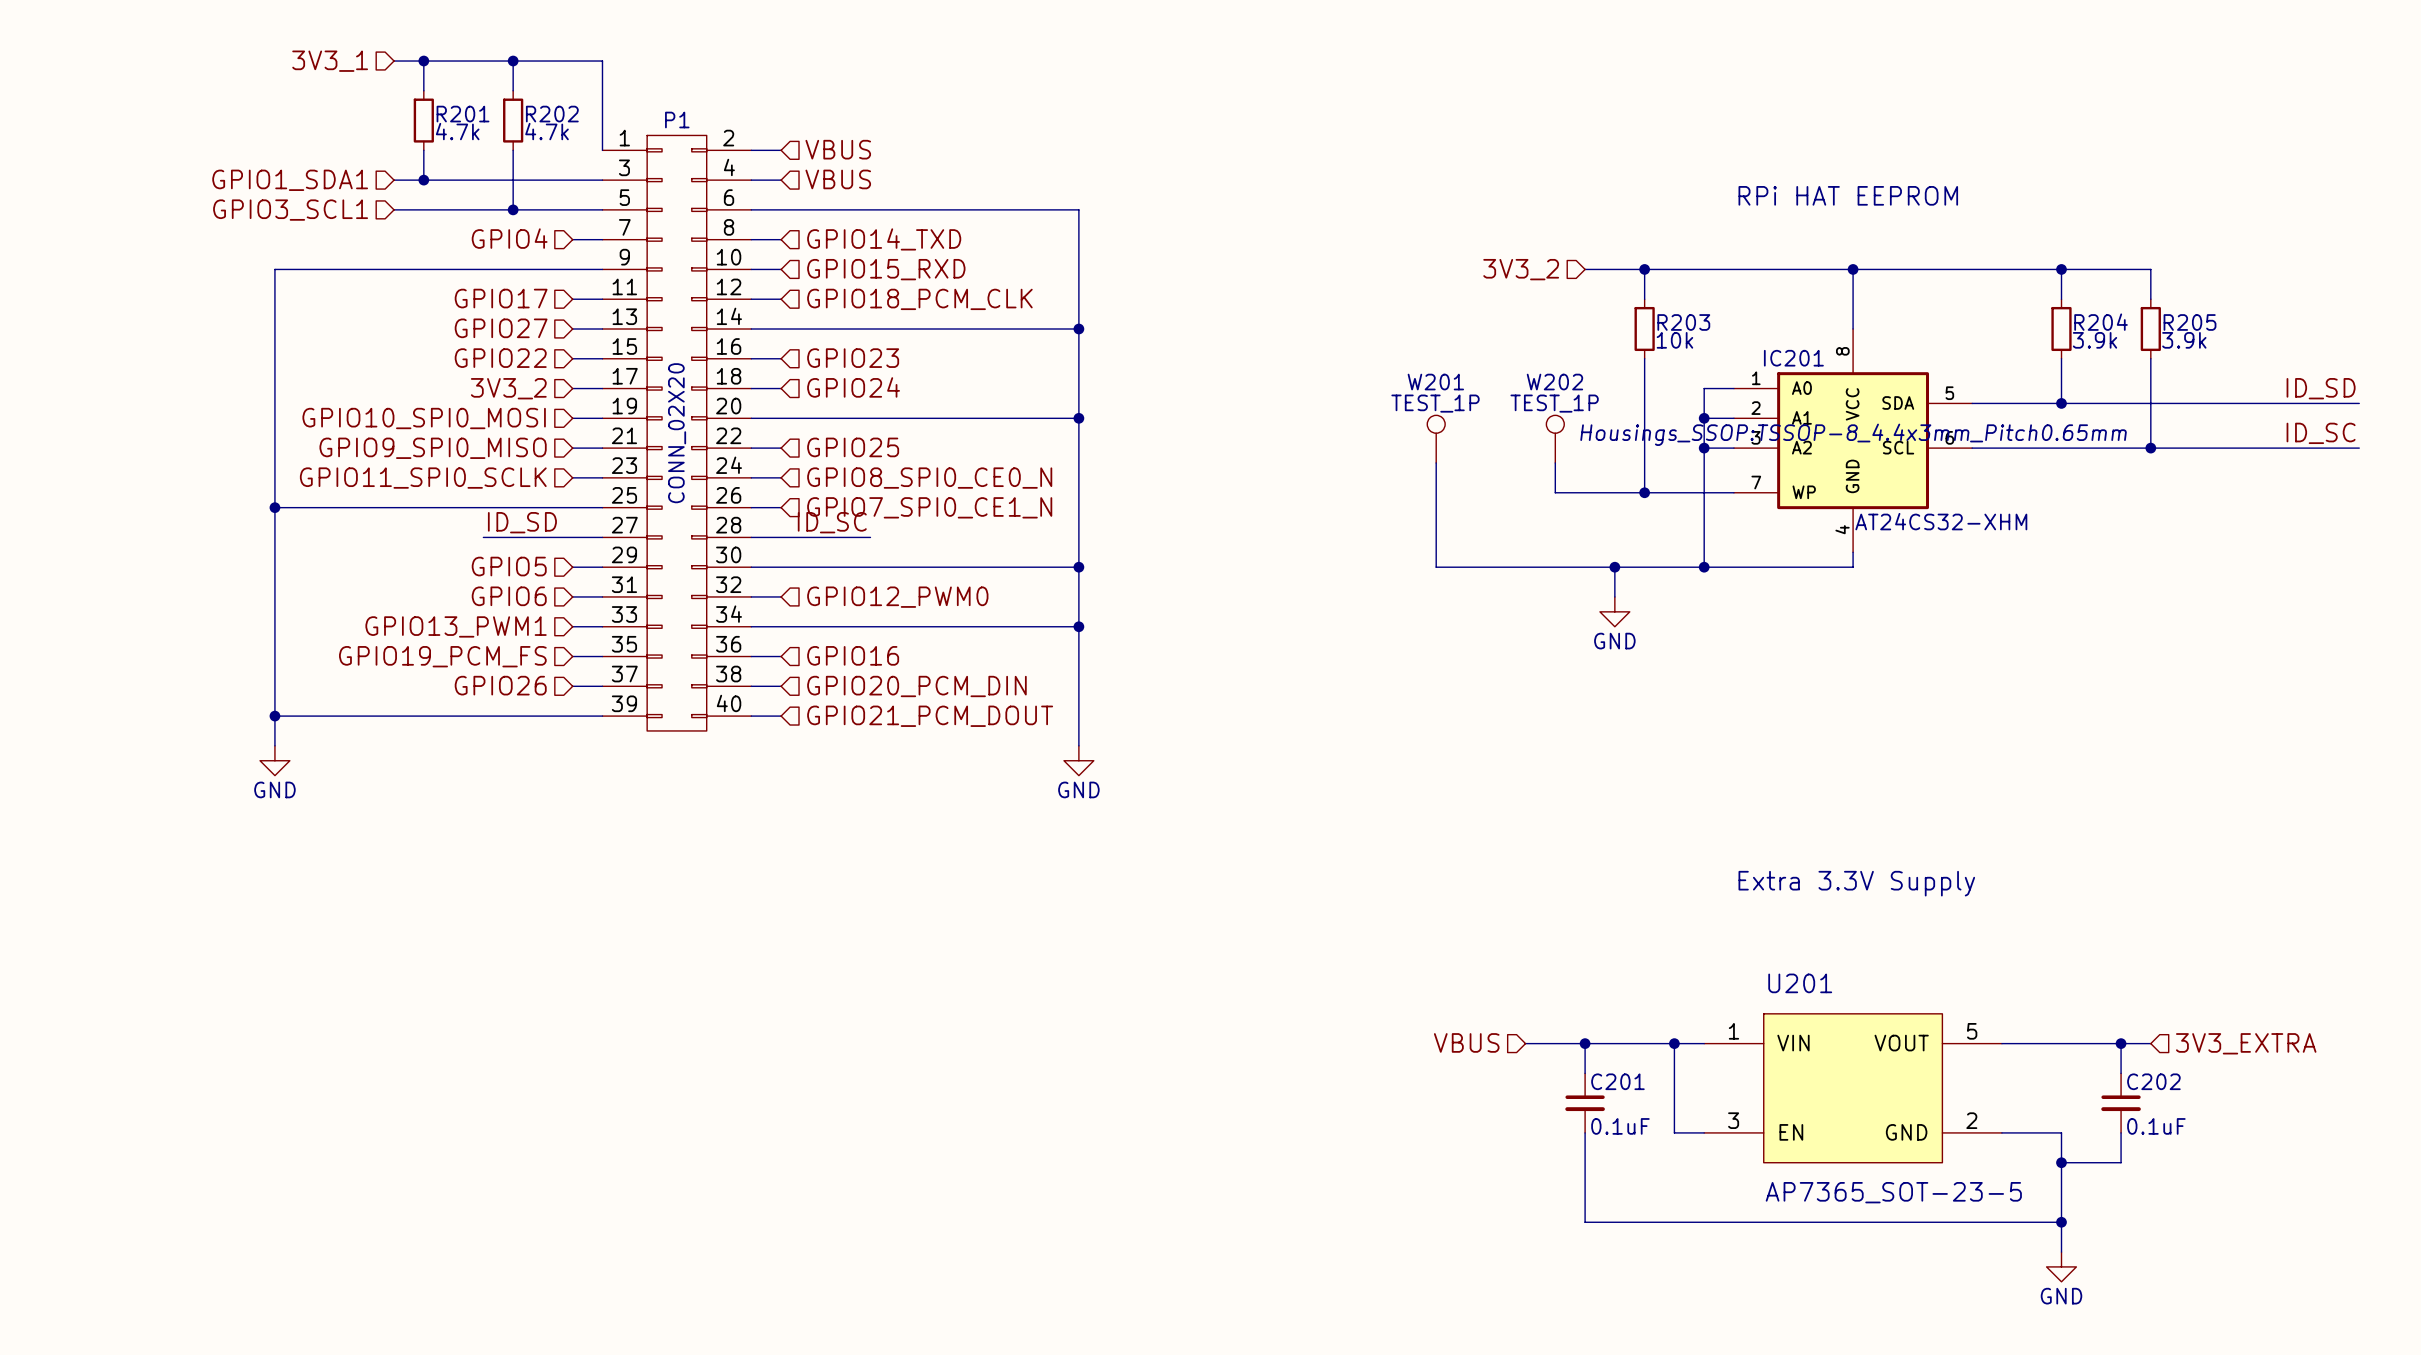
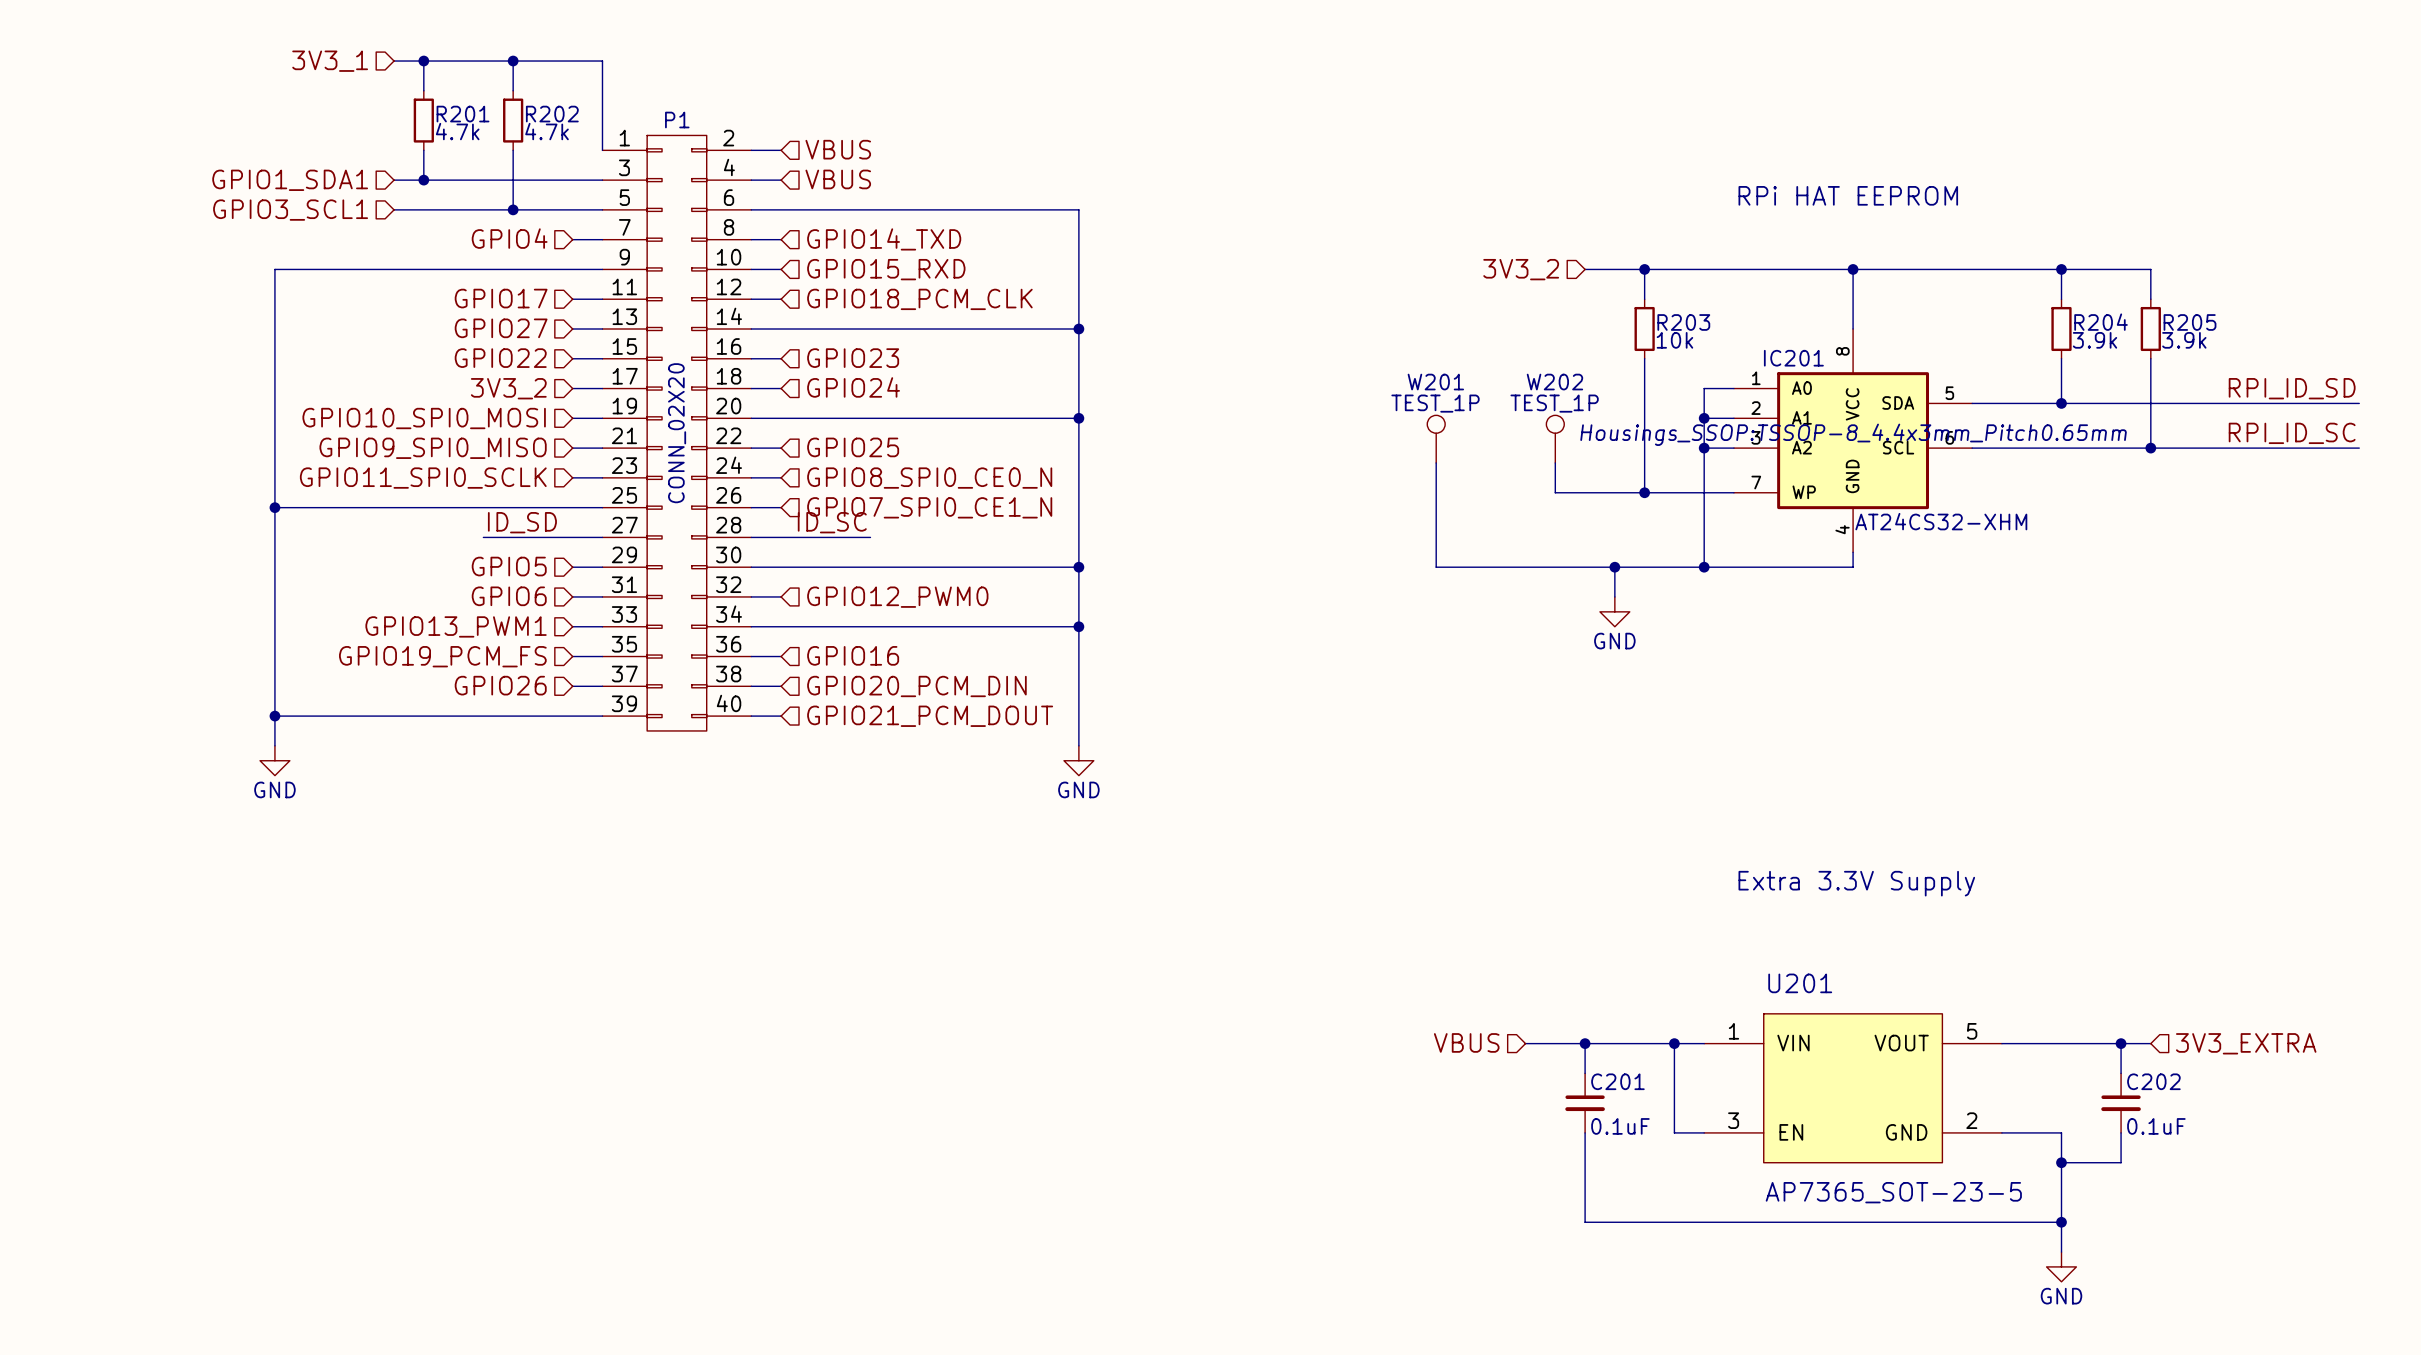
label: ID_SD (2321, 388) -> RPI_ID_SD (2292, 388)
label: ID_SC (2321, 433) -> RPI_ID_SC (2292, 433)

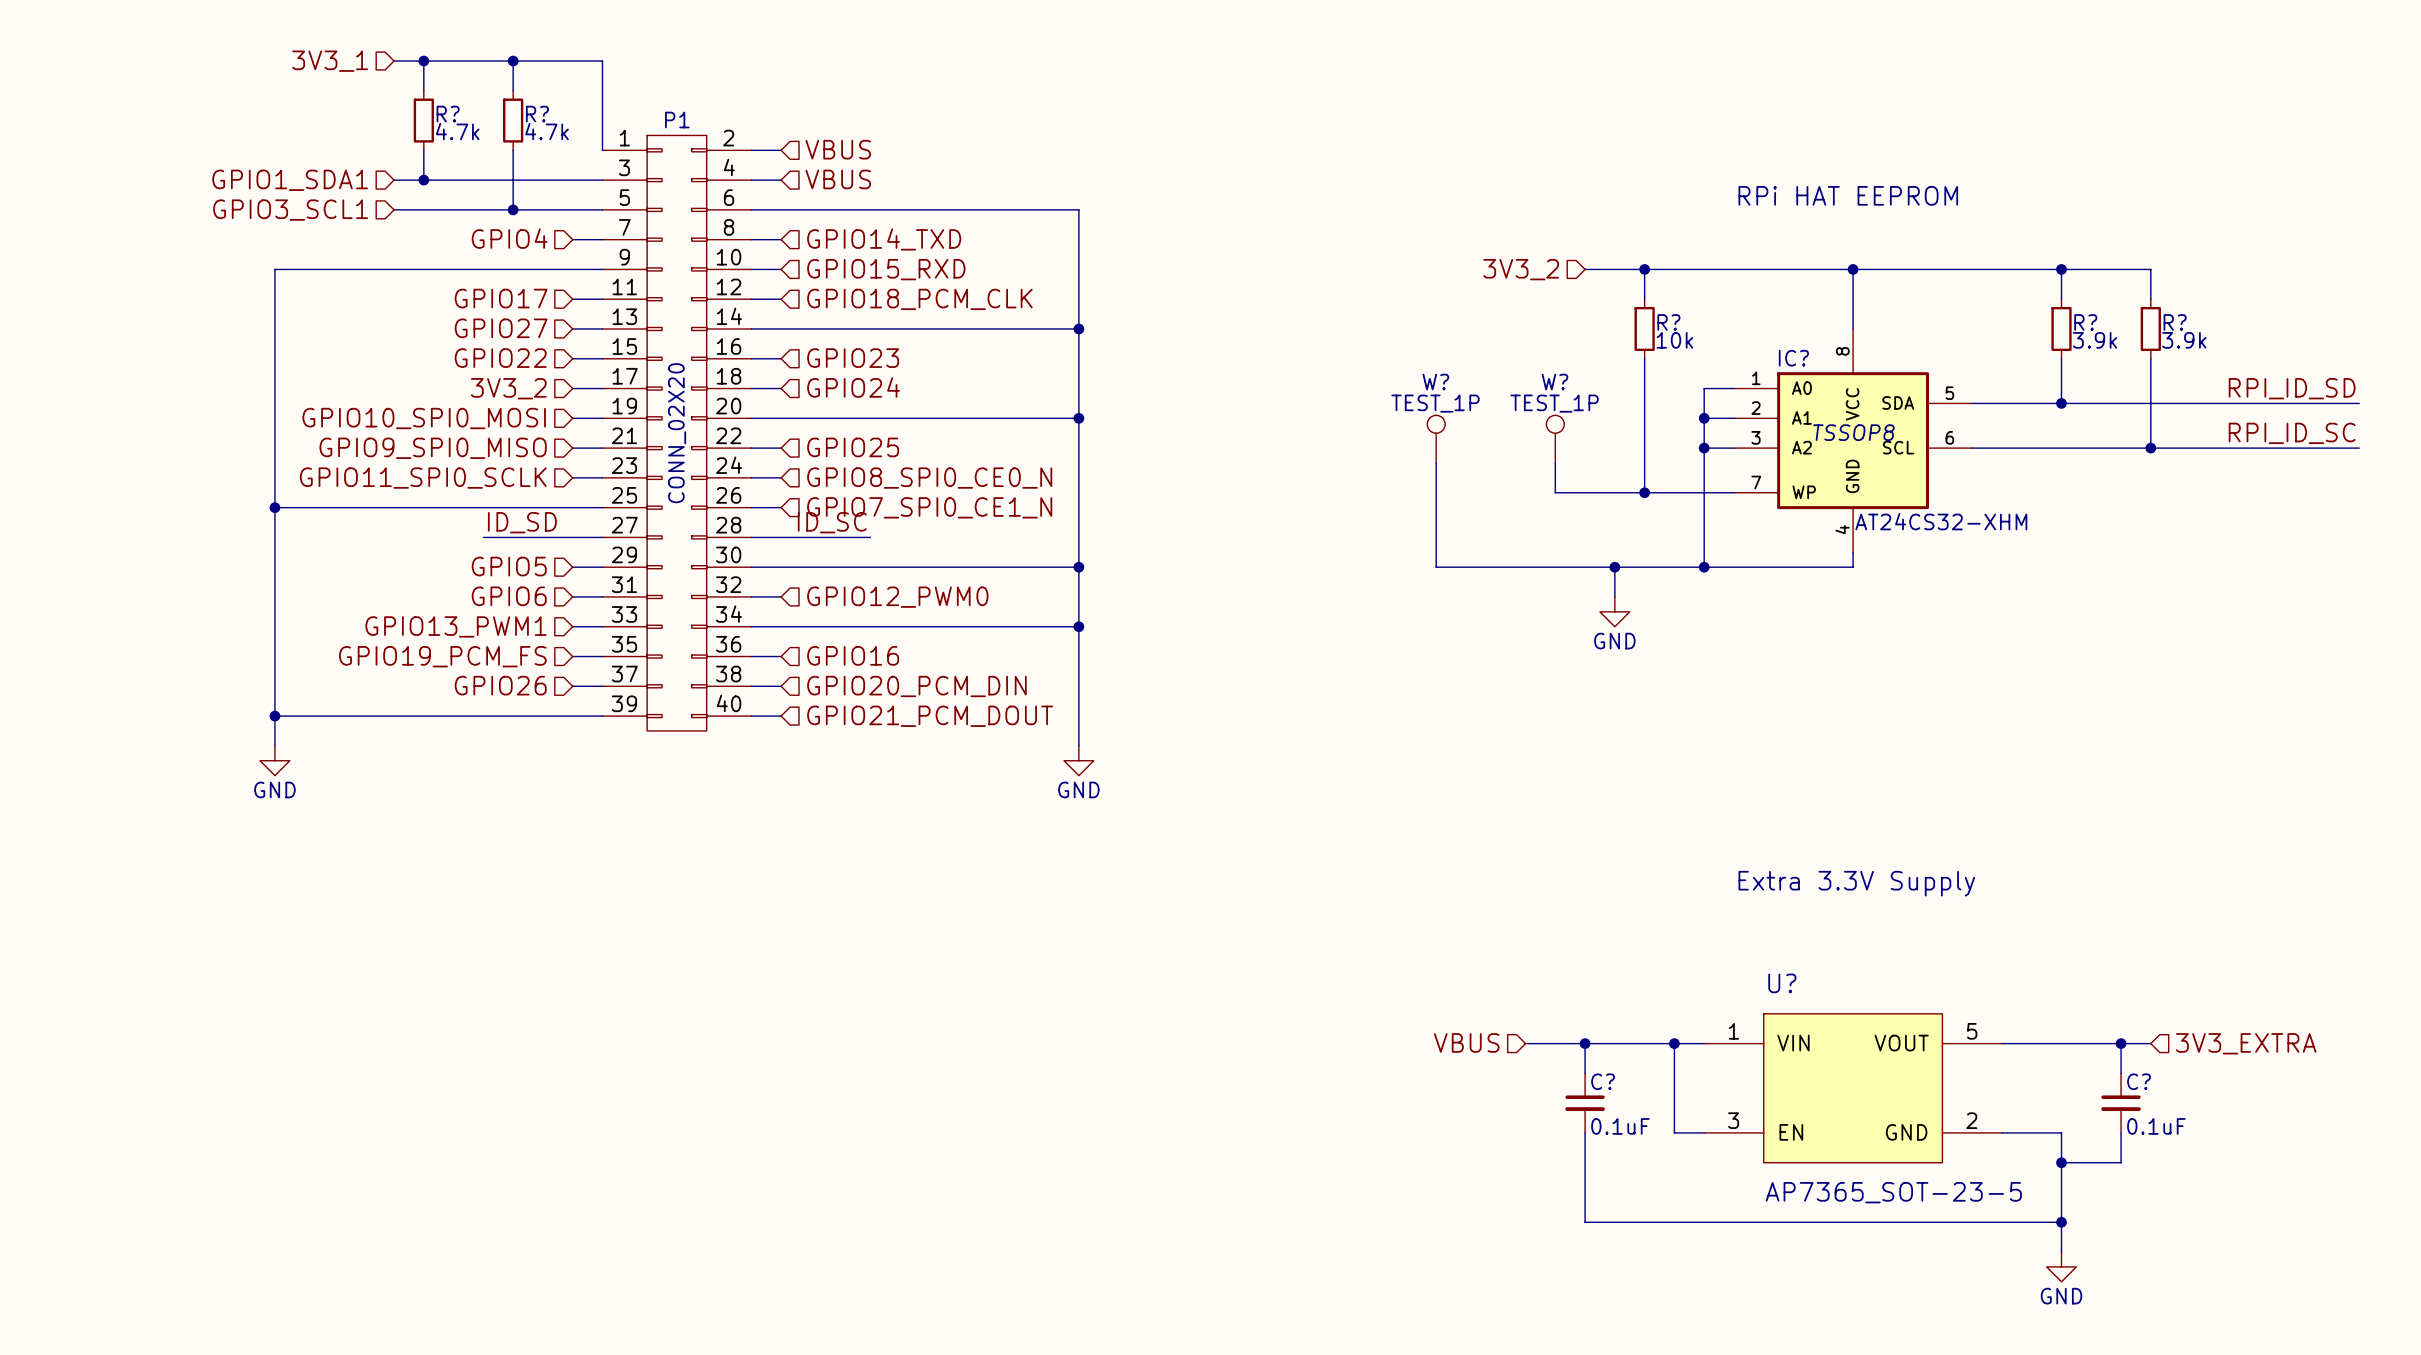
R201 name: R201 (463, 114) -> R? (448, 114)
R202 name: R202 (552, 114) -> R? (537, 114)
R203 name: R203 (1683, 322) -> R? (1668, 322)
R204 name: R204 (2101, 322) -> R? (2085, 322)
R205 name: R205 (2190, 322) -> R? (2175, 322)
IC201 name: IC201 (1793, 358) -> IC? (1793, 358)
W201 name: W201 (1435, 382) -> W? (1435, 382)
W202 name: W202 (1554, 382) -> W? (1554, 382)
IC201 text: Housings_SSOP:TSSOP-8_4.4x3mm_Pitch0.65mm (1853, 434) -> TSSOP8 (1854, 432)
U201 name: U201 (1800, 983) -> U? (1782, 983)
C201 name: C201 (1617, 1081) -> C? (1603, 1081)
C202 name: C202 (2153, 1081) -> C? (2139, 1081)

